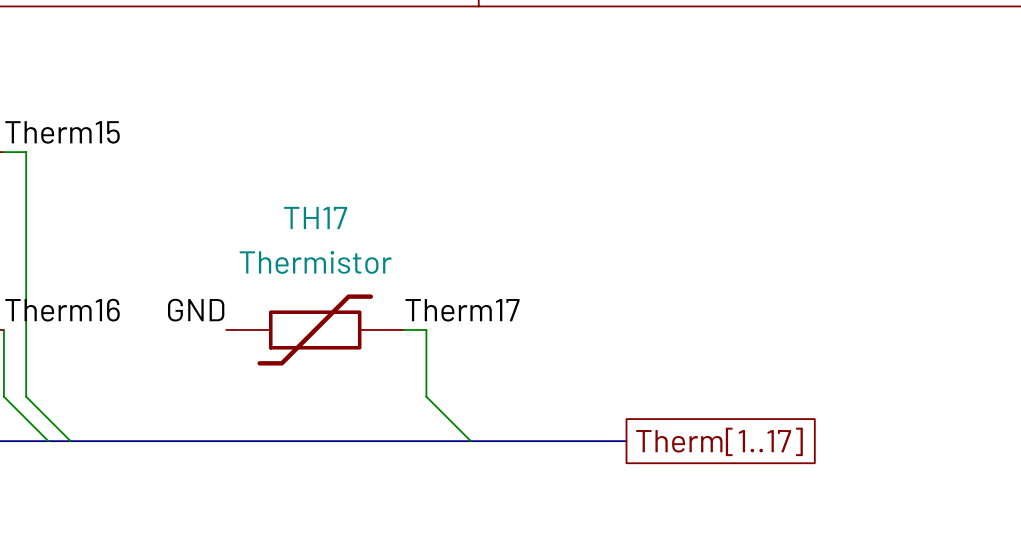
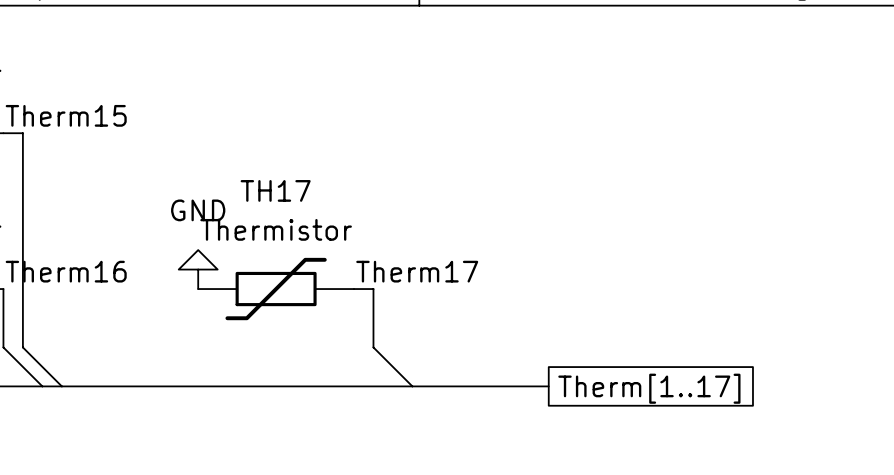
power symbol: none -> GND (198, 269)
label: GND (196, 310) -> none

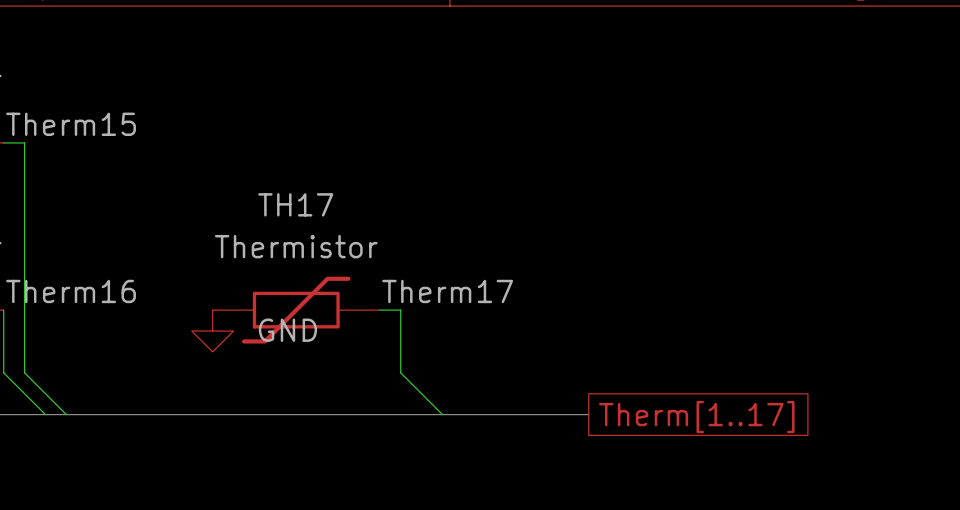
power symbol text position: GND (198, 210) -> GND (287, 330)
power symbol rotation: 0° (198, 269) -> 180° (212, 331)
power symbol position: GND (198, 269) -> GND (212, 331)

